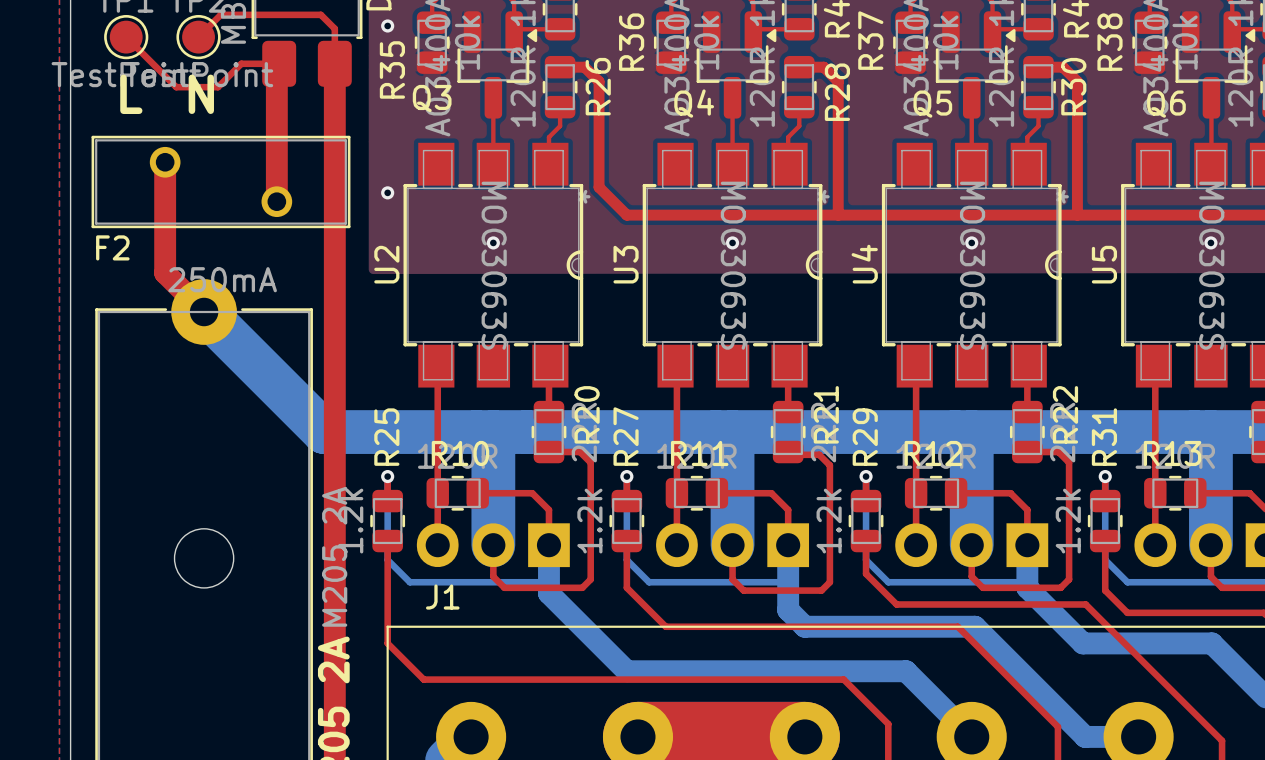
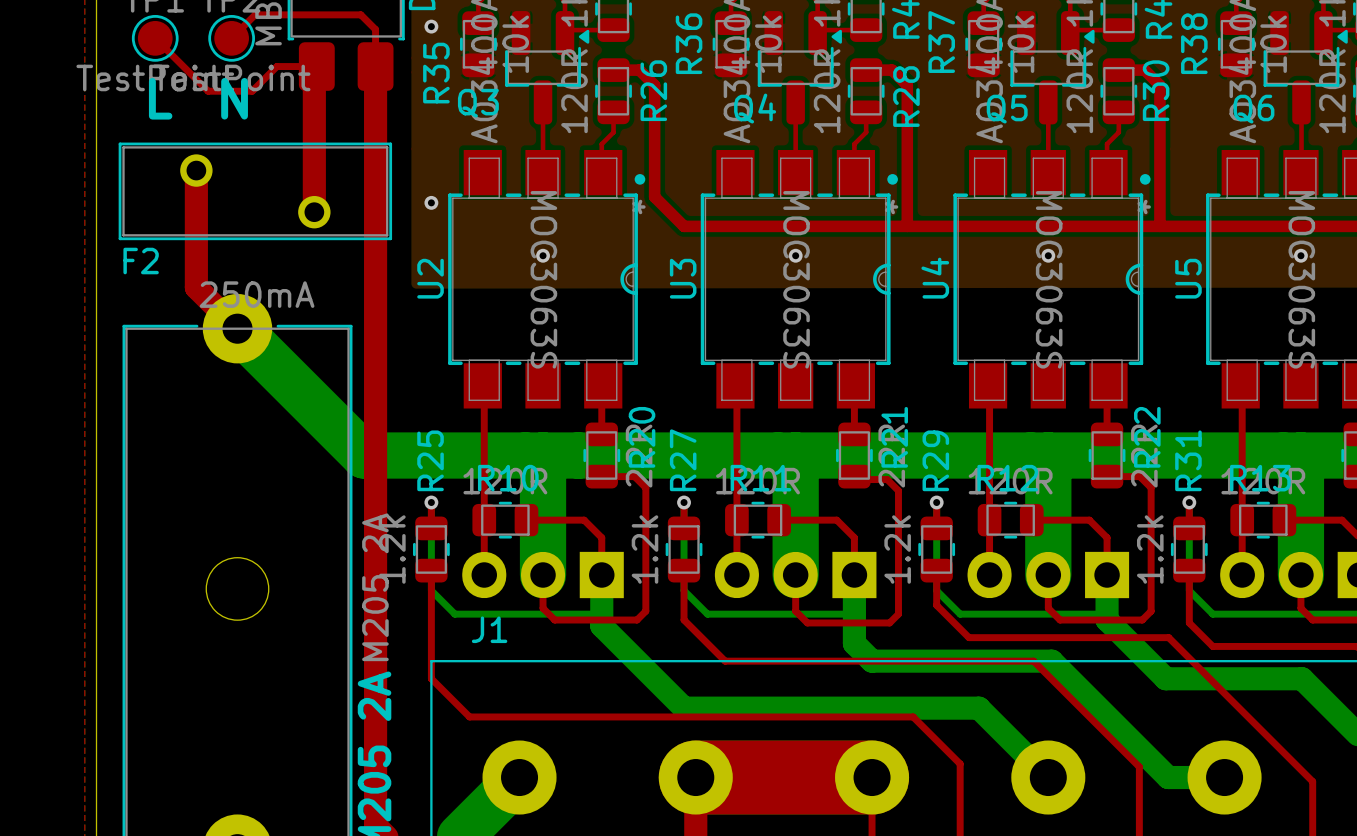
drawing: none -> [634, 174, 646, 185]
drawing: none -> [887, 174, 898, 185]
drawing: none -> [1139, 174, 1151, 185]

